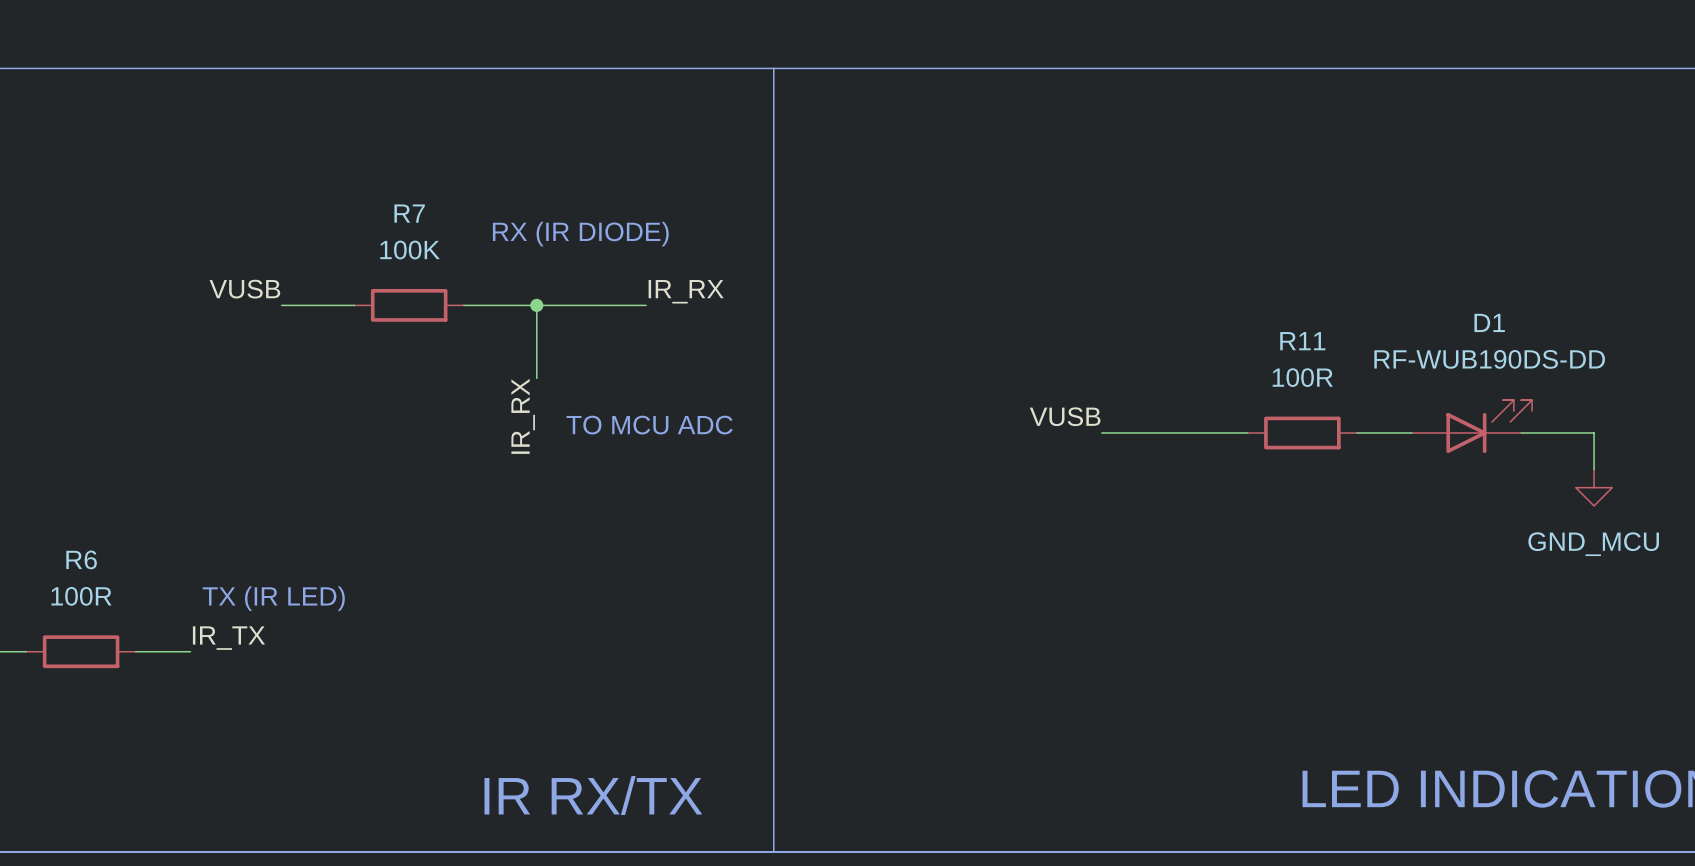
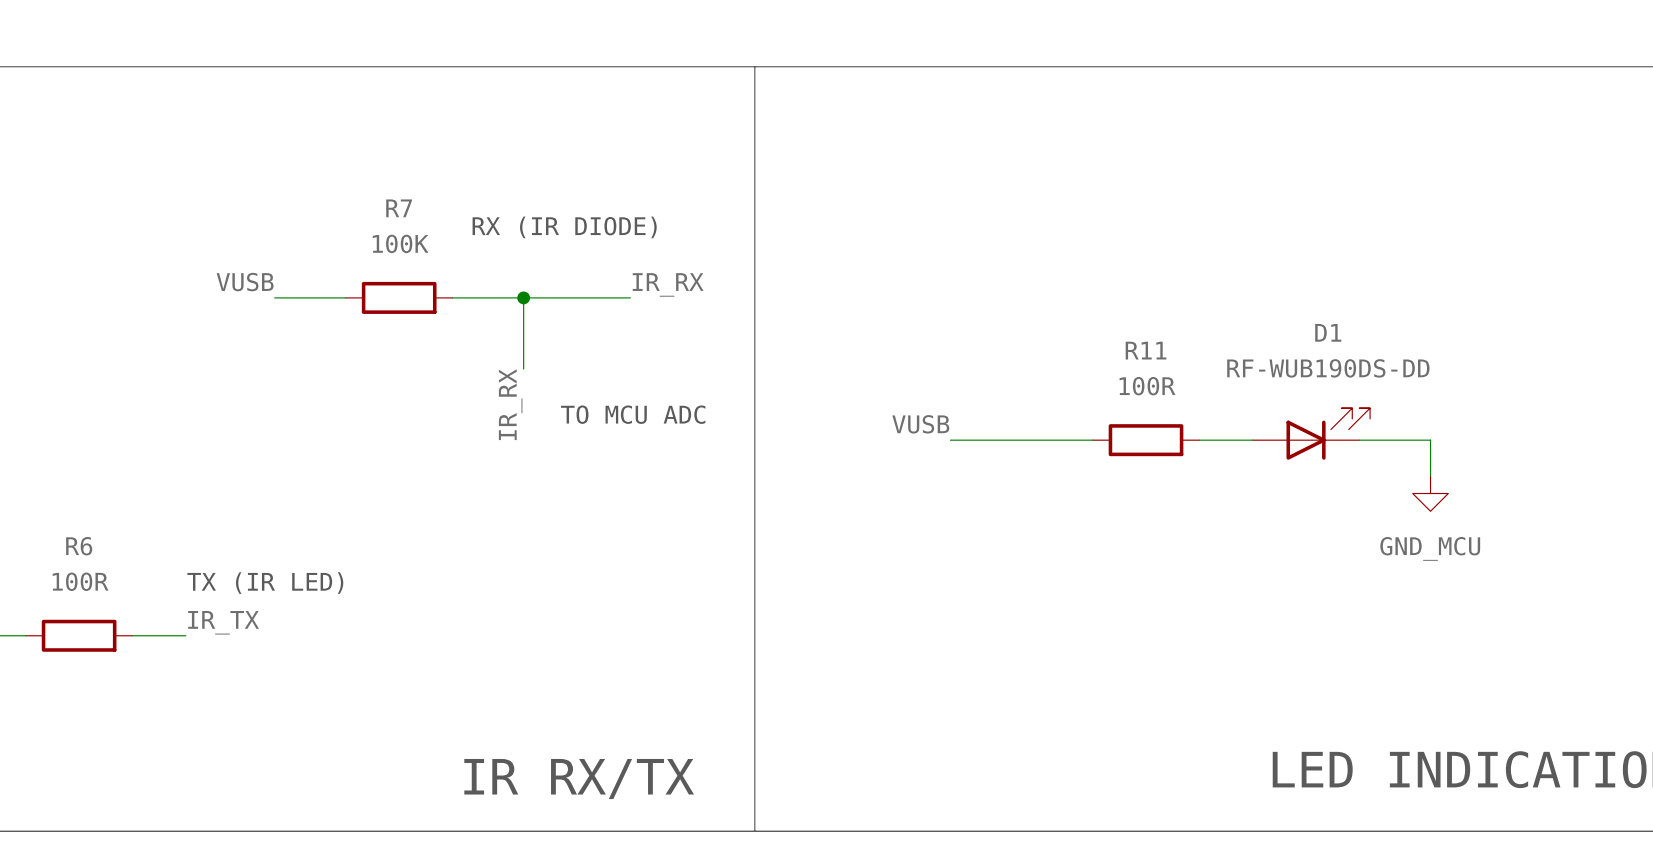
label position: VUSB (1065, 416) -> VUSB (920, 424)
D1 position: (1471, 426) -> (1311, 433)
wire: (1101, 432) (1247, 432) -> (950, 440) (1092, 440)
R11 position: (1302, 432) -> (1146, 440)
wire: (1357, 432) (1411, 432) -> (1199, 440) (1252, 440)
wire: (1521, 432) (1594, 432) (1594, 469) -> (1359, 440) (1430, 440) (1430, 475)
power symbol position: GND_MCU (1594, 487) -> GND_MCU (1430, 493)

